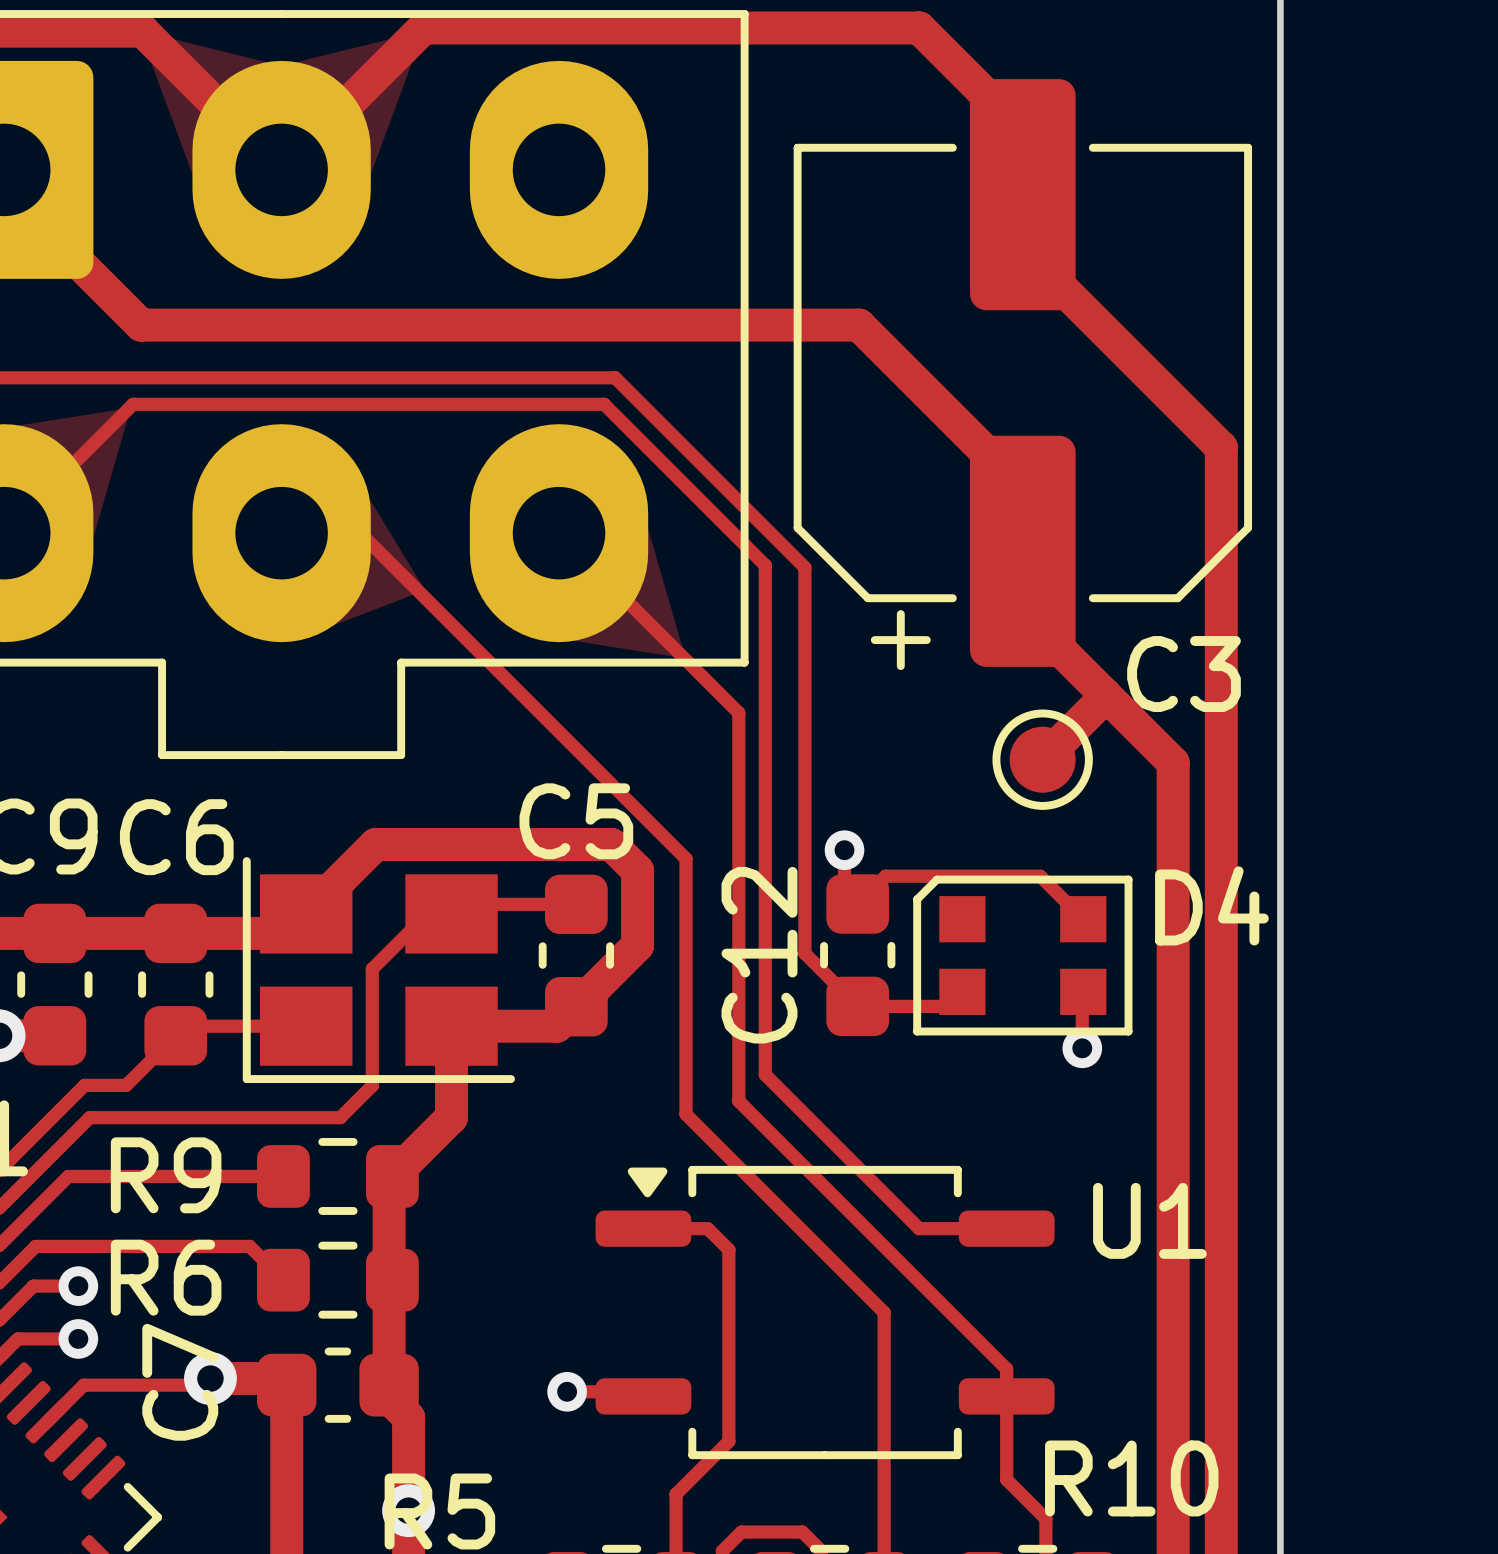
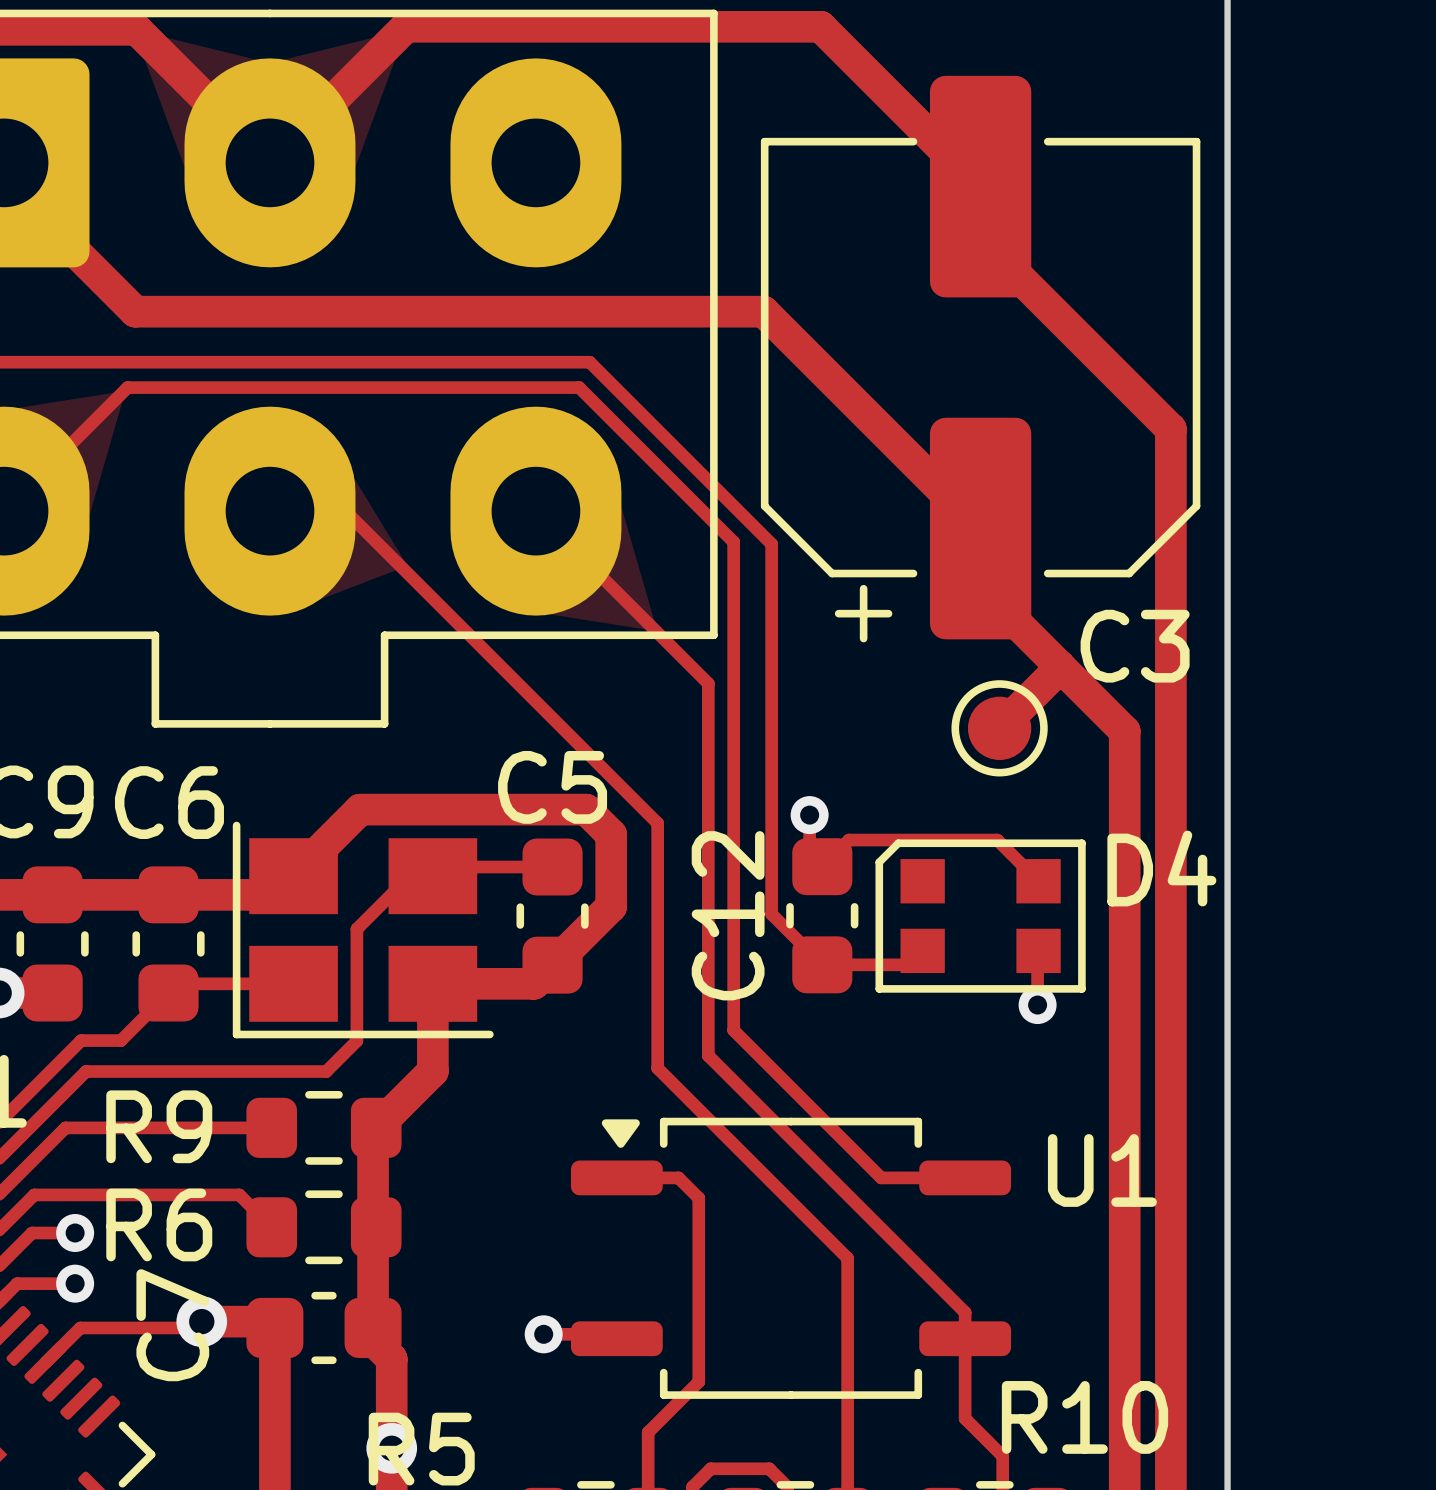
track: (856, 27) (919, 27) (1022, 131) (1022, 194) -> (820, 26) (980, 186)
track: (796, 325) (859, 325) (1022, 488) (1022, 551) -> (763, 311) (980, 528)

